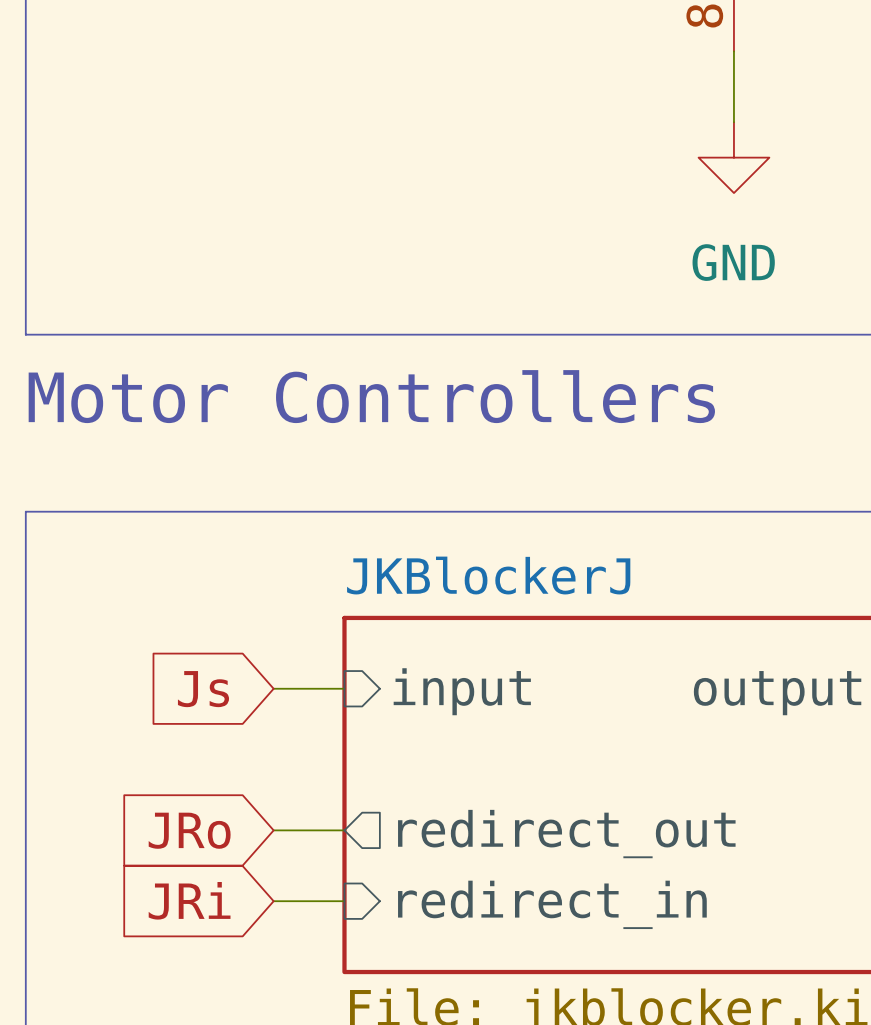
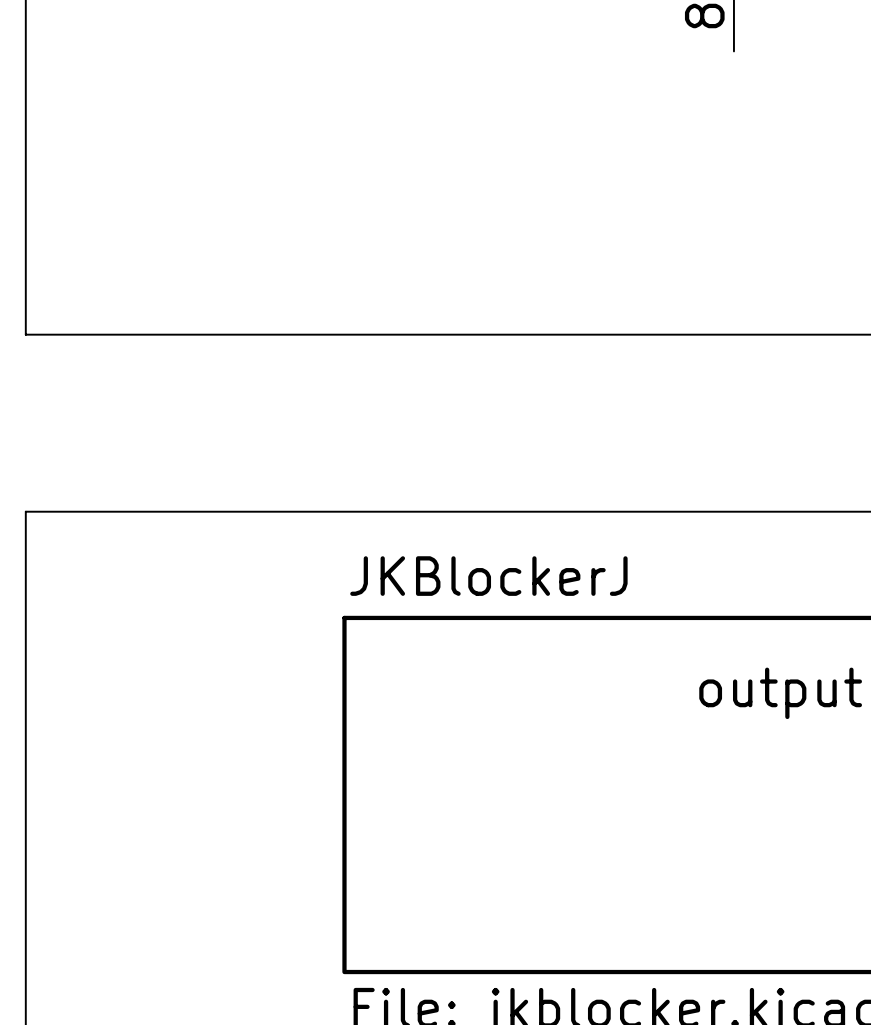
wire: (733, 51) (733, 122) -> none
power symbol: GND (733, 157) -> none
text: Motor Controllers (371, 396) -> none
wire: (273, 688) (344, 688) -> none
global label: Js (203, 689) -> none
sheet pin: input (462, 691) -> none
global label: JRo (189, 830) -> none
wire: (273, 830) (344, 830) -> none
sheet pin: redirect_out (566, 834) -> none
global label: JRi (189, 900) -> none
wire: (273, 901) (344, 901) -> none
sheet pin: redirect_in (552, 904) -> none

